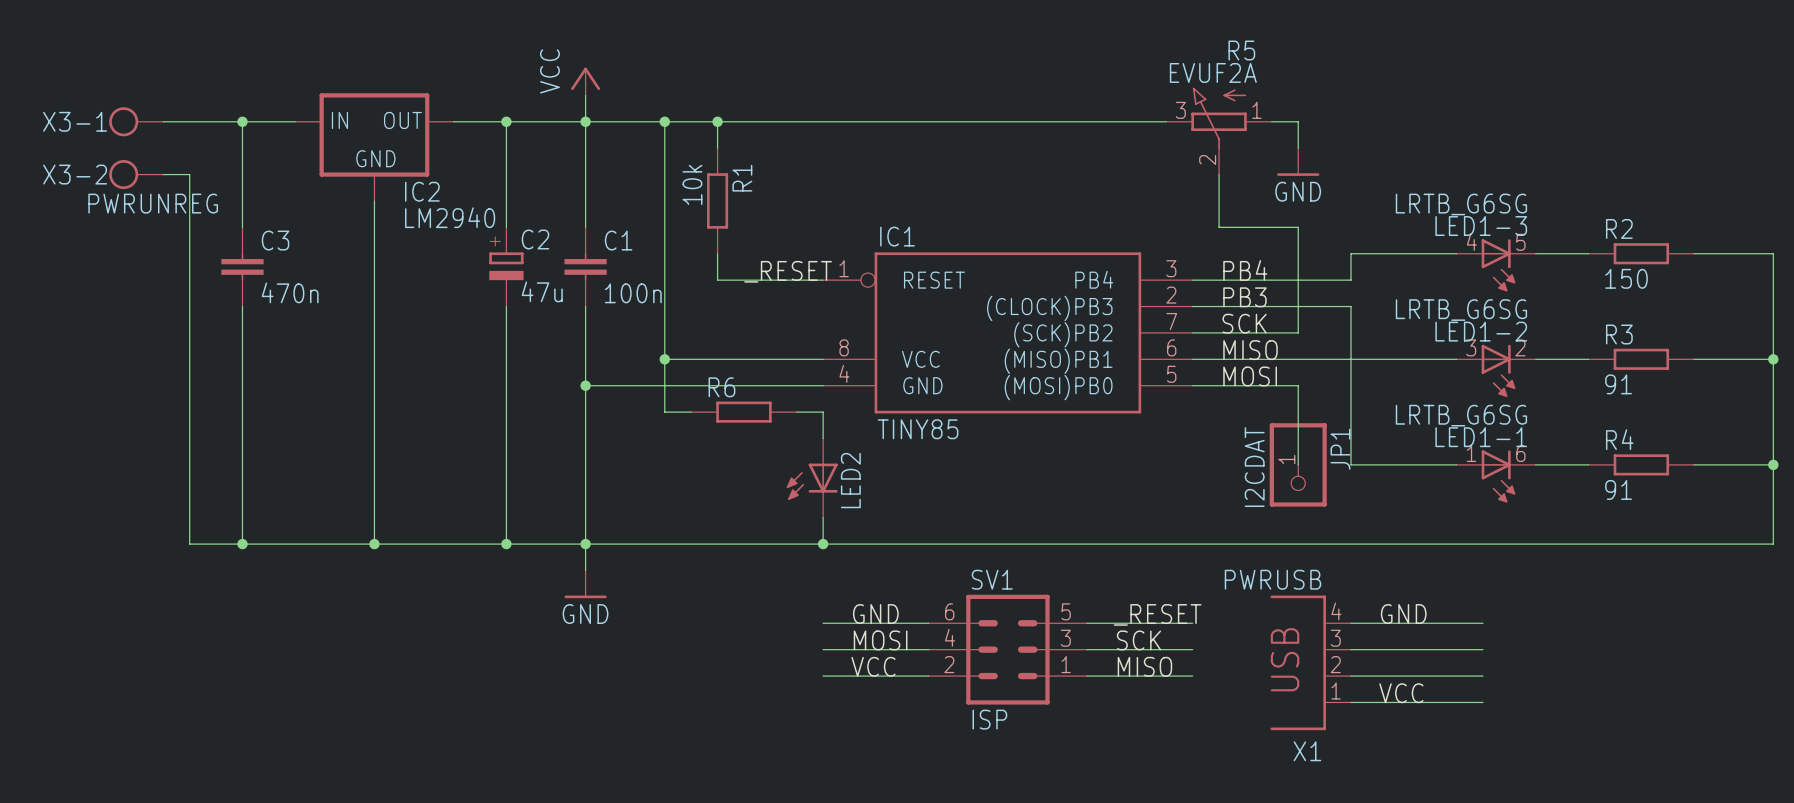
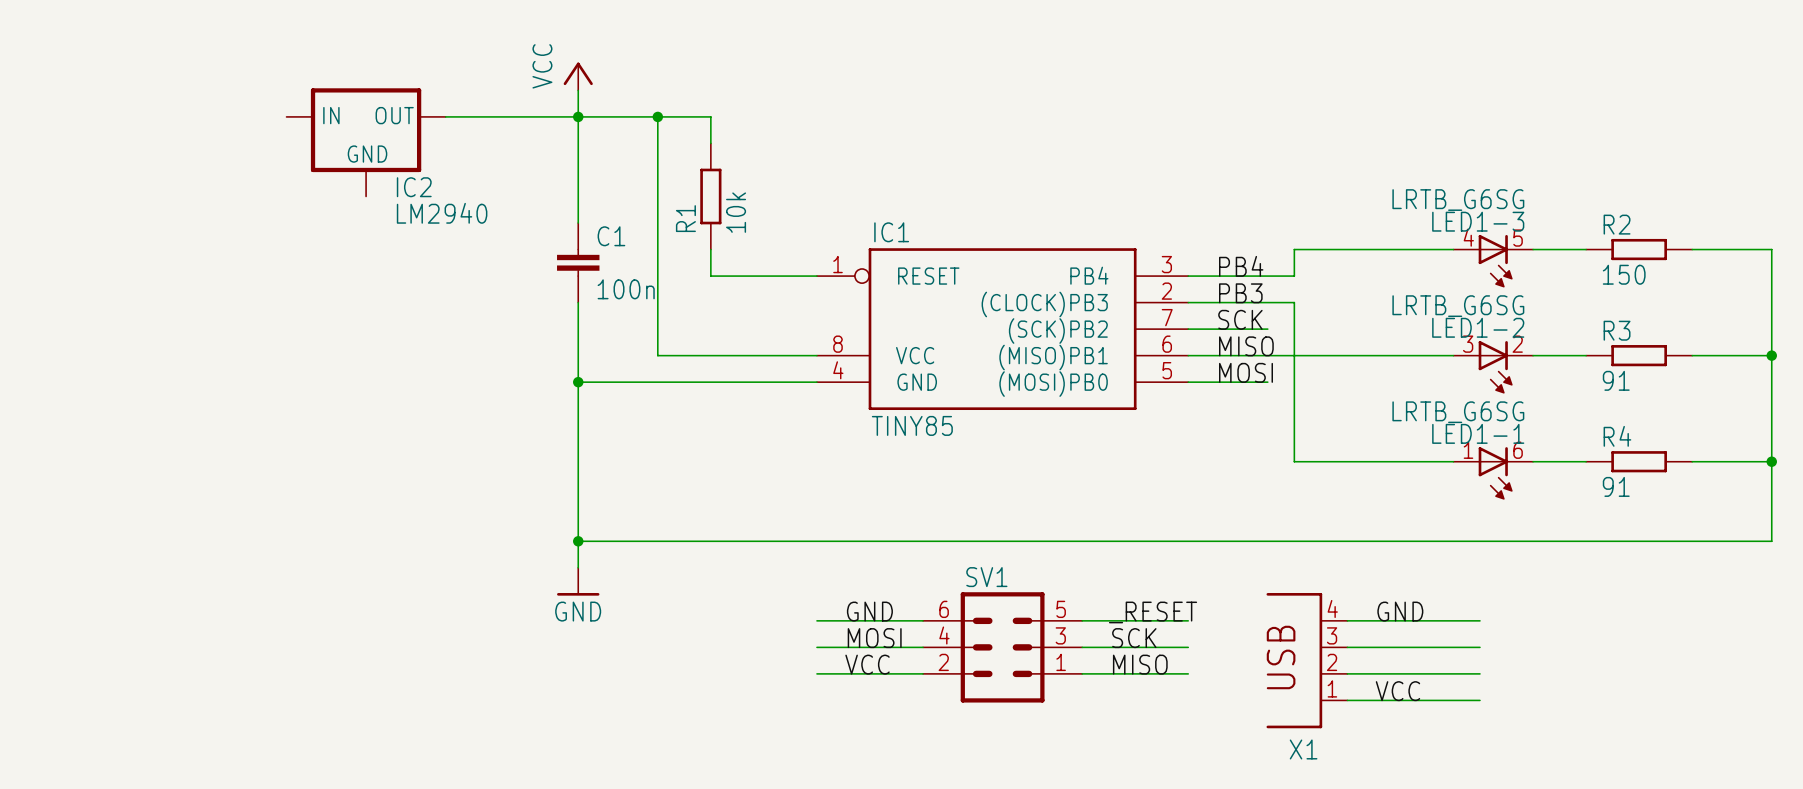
X3-1: (136, 121) -> none
wire: (163, 121) (295, 121) -> none
wire: (242, 121) (242, 227) -> none
junction: (242, 121) -> none
wire: (506, 121) (506, 227) -> none
junction: (506, 121) -> none
wire: (717, 121) (1166, 121) -> none
junction: (717, 121) -> none
wire: (1271, 121) (1298, 121) (1298, 148) -> none
R5: EVUF2A (1219, 131) -> none
power symbol: GND (1298, 162) -> none
X3-2: PWRUNREG (136, 174) -> none
wire: (163, 174) (189, 174) (189, 544) (585, 544) -> none
wire: (1219, 174) (1219, 227) (1298, 227) (1298, 253) -> (1347, 249) (1294, 249)
R1 name position: R1 (742, 178) -> R1 (685, 218)
R1 value position: 10k (692, 184) -> 10k (736, 212)
wire: (374, 200) (374, 544) -> none
wire: (1351, 253) (1351, 280) (1298, 280) (1298, 306) (1351, 306) (1351, 464) -> (1294, 461) (1347, 461)
C3: 470n (242, 266) -> none
C2: 47u (506, 266) -> none
label: _RESET (788, 271) -> none
wire: (242, 306) (242, 544) -> none
wire: (506, 306) (506, 544) -> none
wire: (1271, 332) (1298, 332) -> (1294, 382) (1294, 329)
wire: (664, 359) (664, 412) (691, 412) -> none
junction: (664, 359) -> none
wire: (1271, 385) (1298, 385) -> none
R6: (743, 412) -> none
wire: (796, 412) (823, 412) (823, 438) -> none
JP1: I2CDAT (1298, 464) -> none
LED2: (812, 478) -> none
wire: (823, 517) (823, 544) -> none
junction: (242, 544) -> none
junction: (374, 544) -> none
junction: (506, 544) -> none
junction: (823, 544) -> none
X1 value: PWRUSB (1272, 579) -> none
SV1 value: ISP (989, 719) -> none

